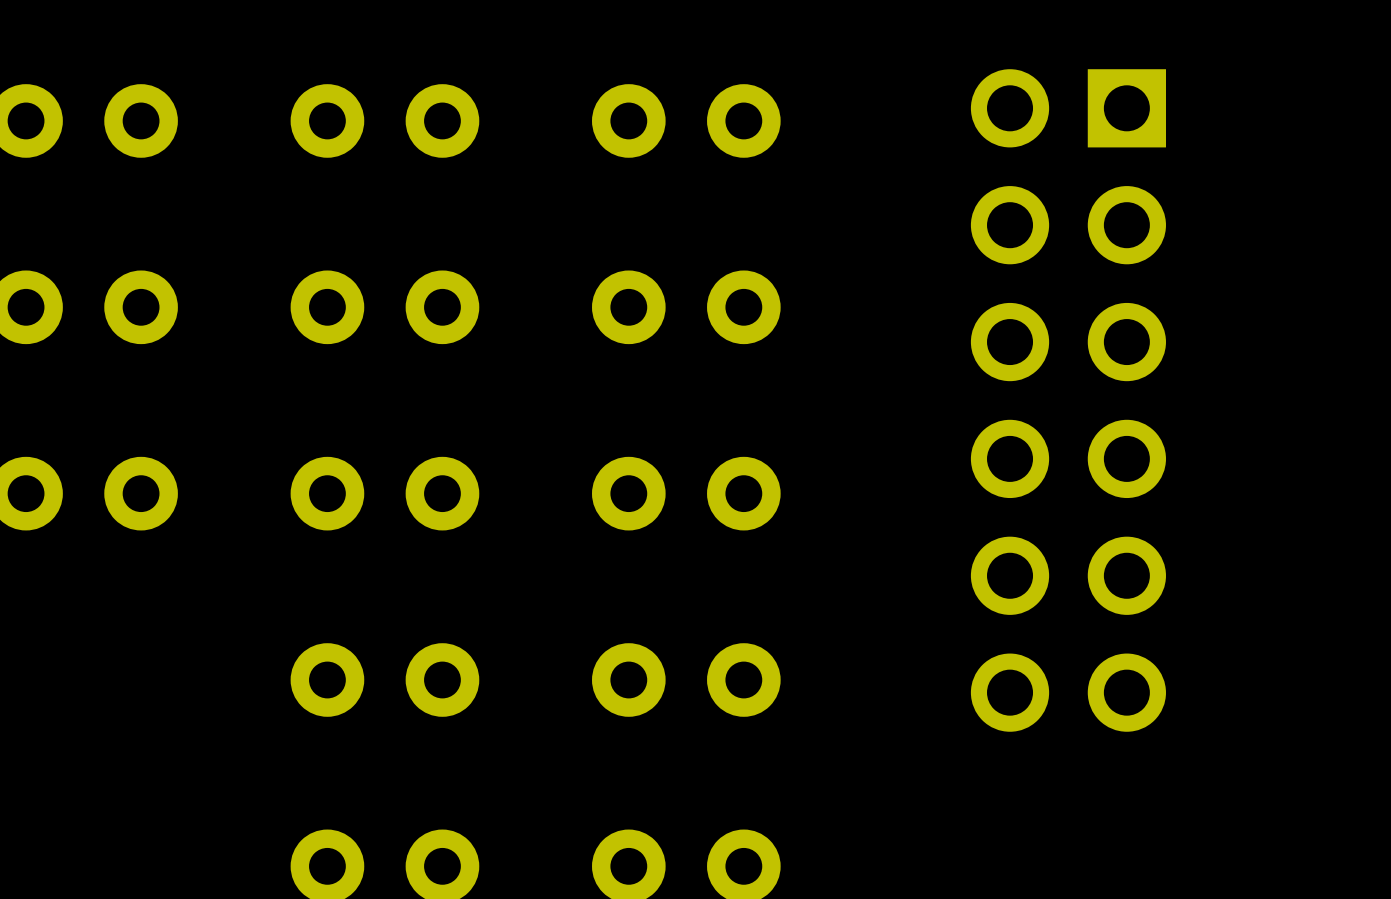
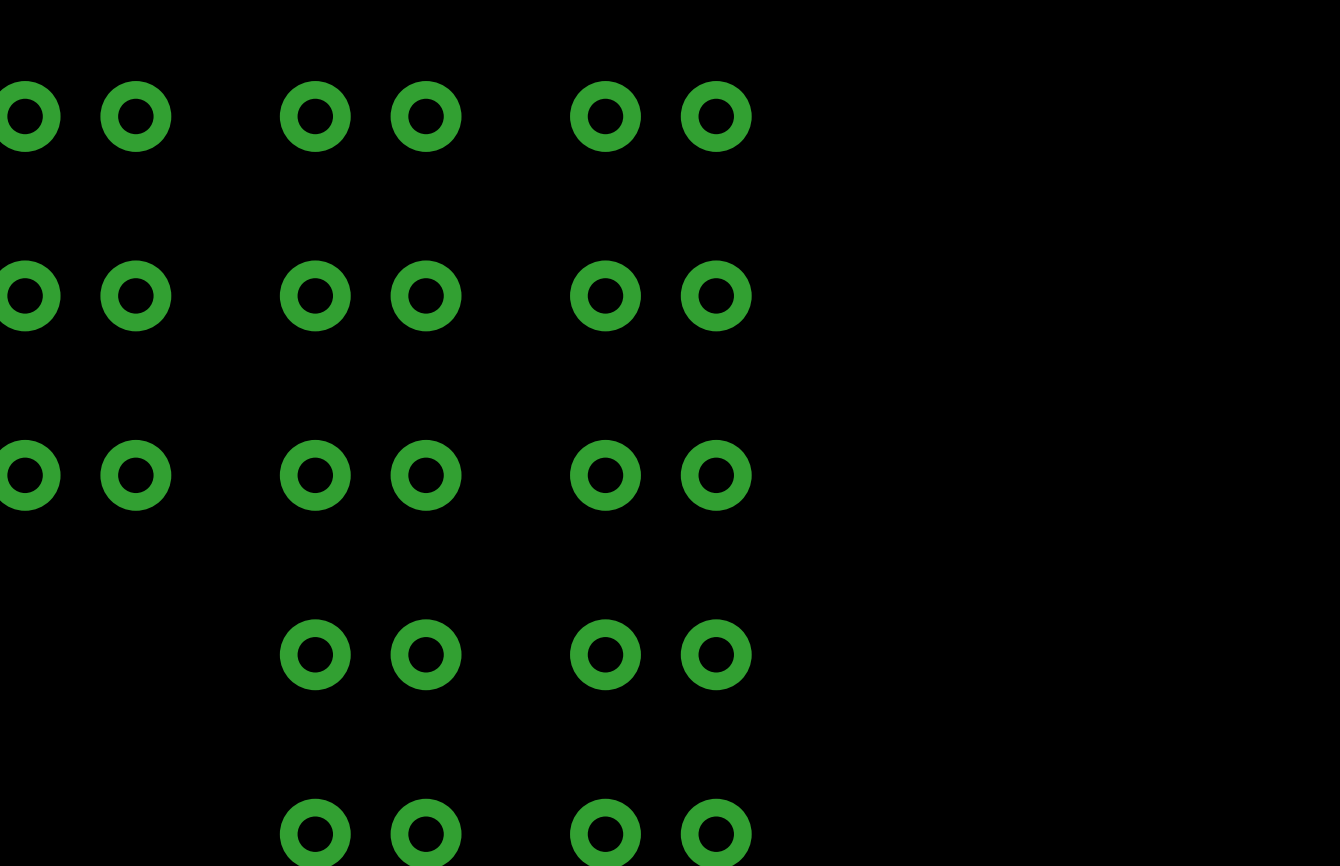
part: (1068, 400) -> none

